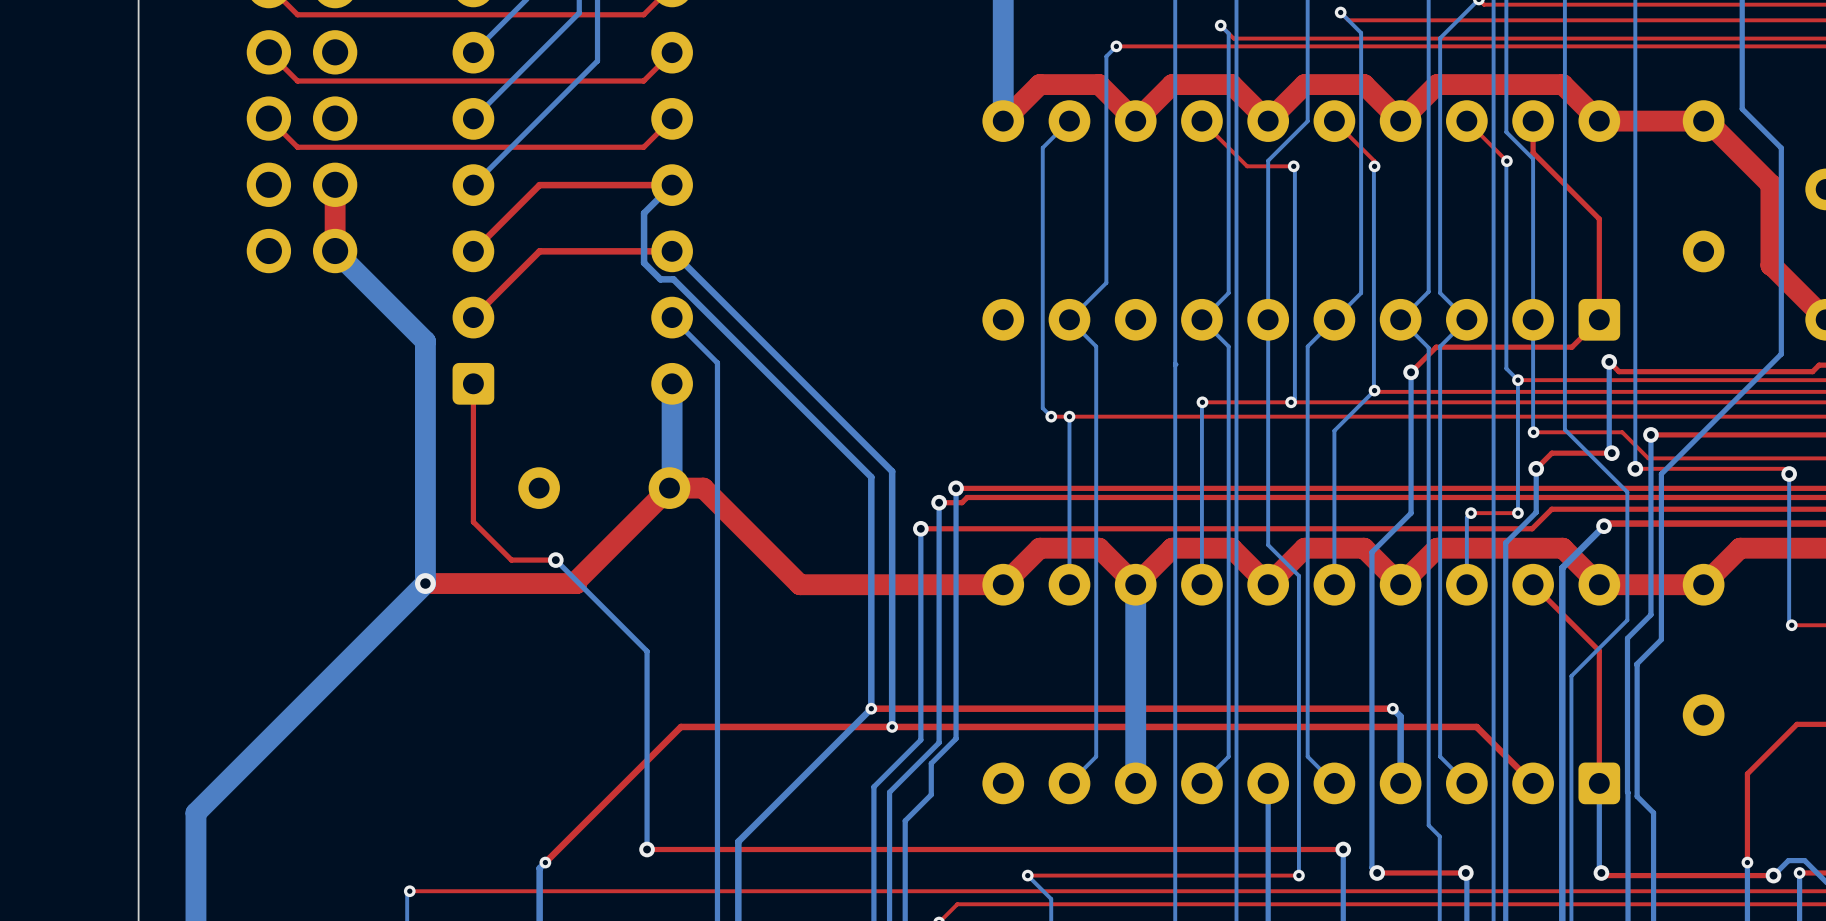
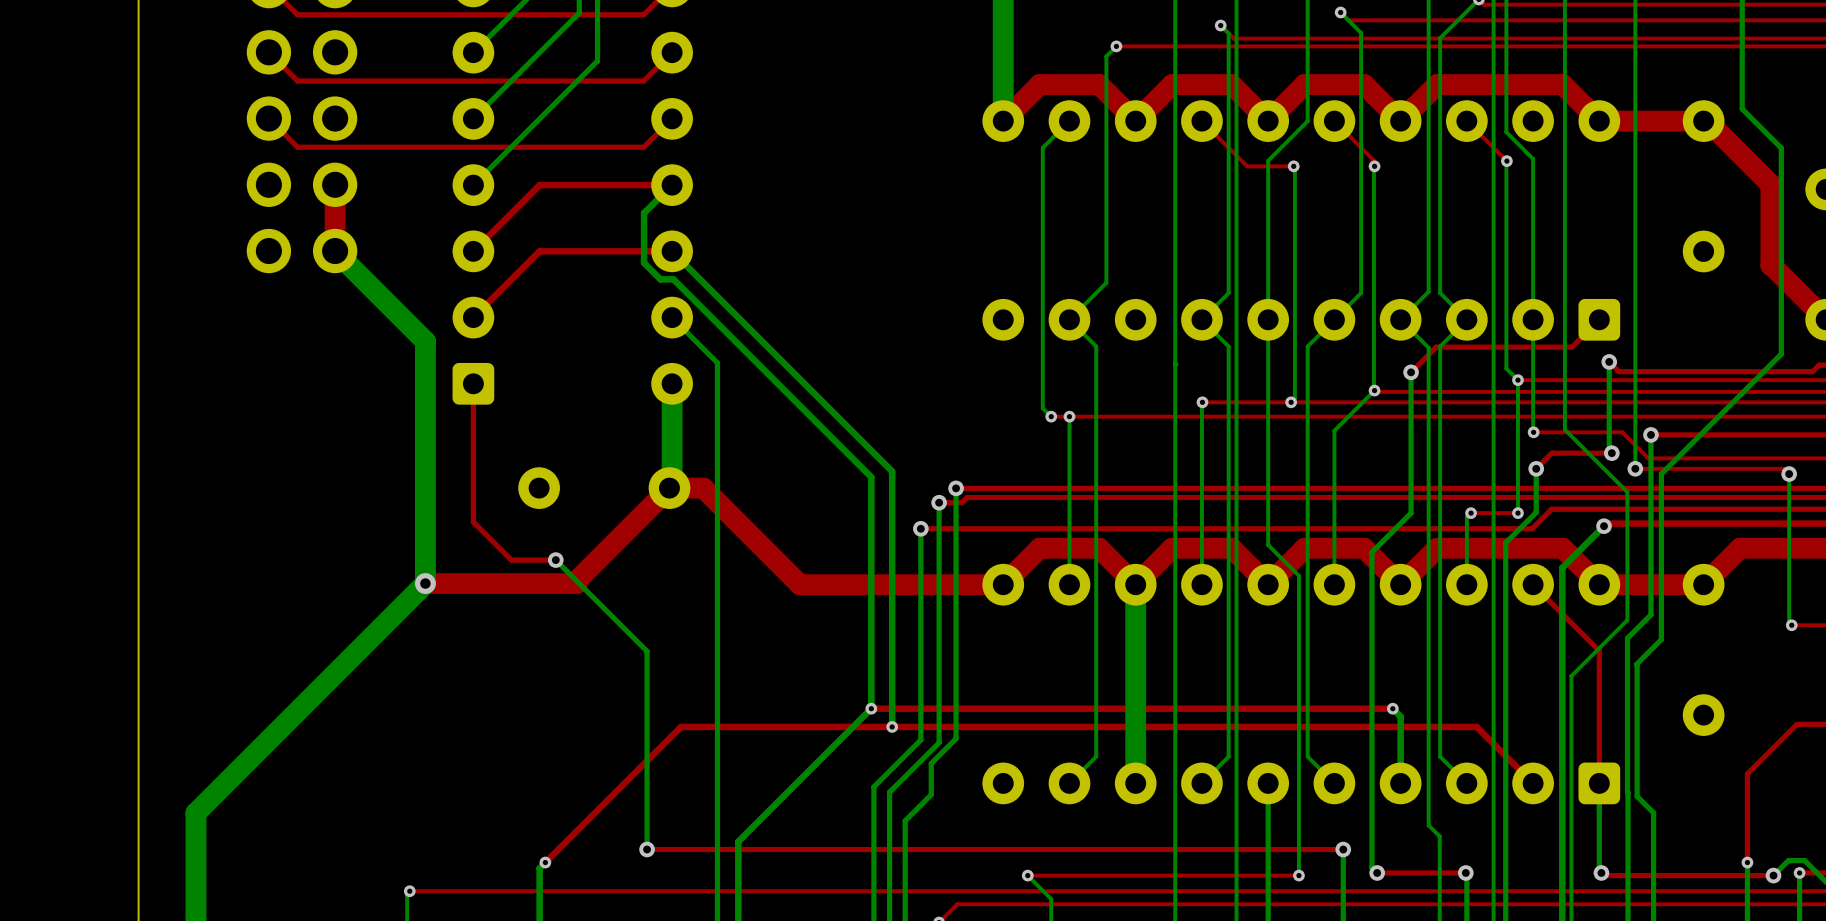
top track: (1533, 121) (1533, 152) (1599, 219) (1599, 319) -> none

